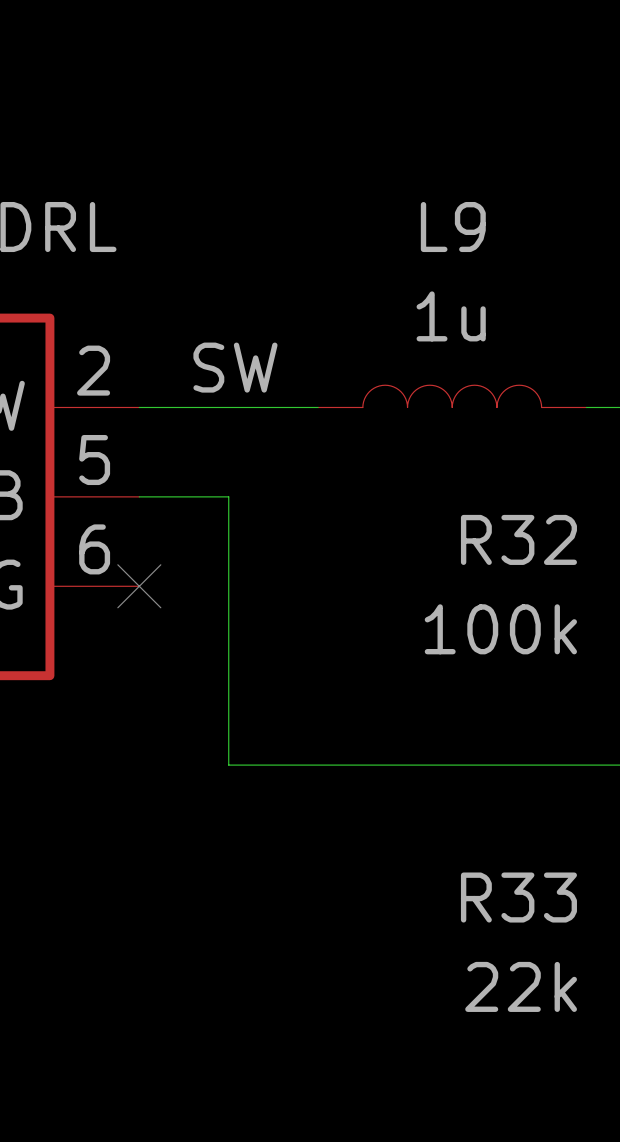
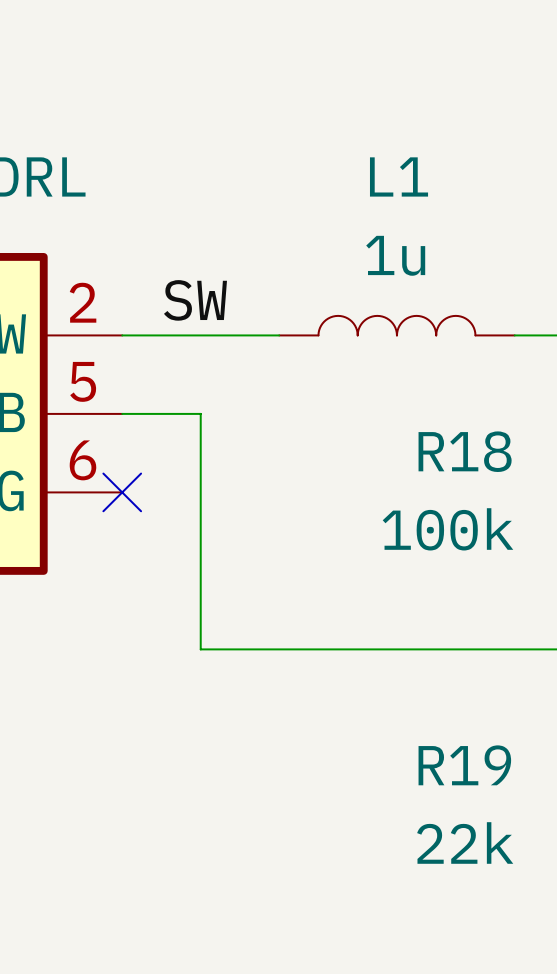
L9 name: L9 (453, 227) -> L1 (399, 176)
R32 name: R32 (518, 539) -> R18 (465, 451)
R33 name: R33 (518, 897) -> R19 (464, 765)

